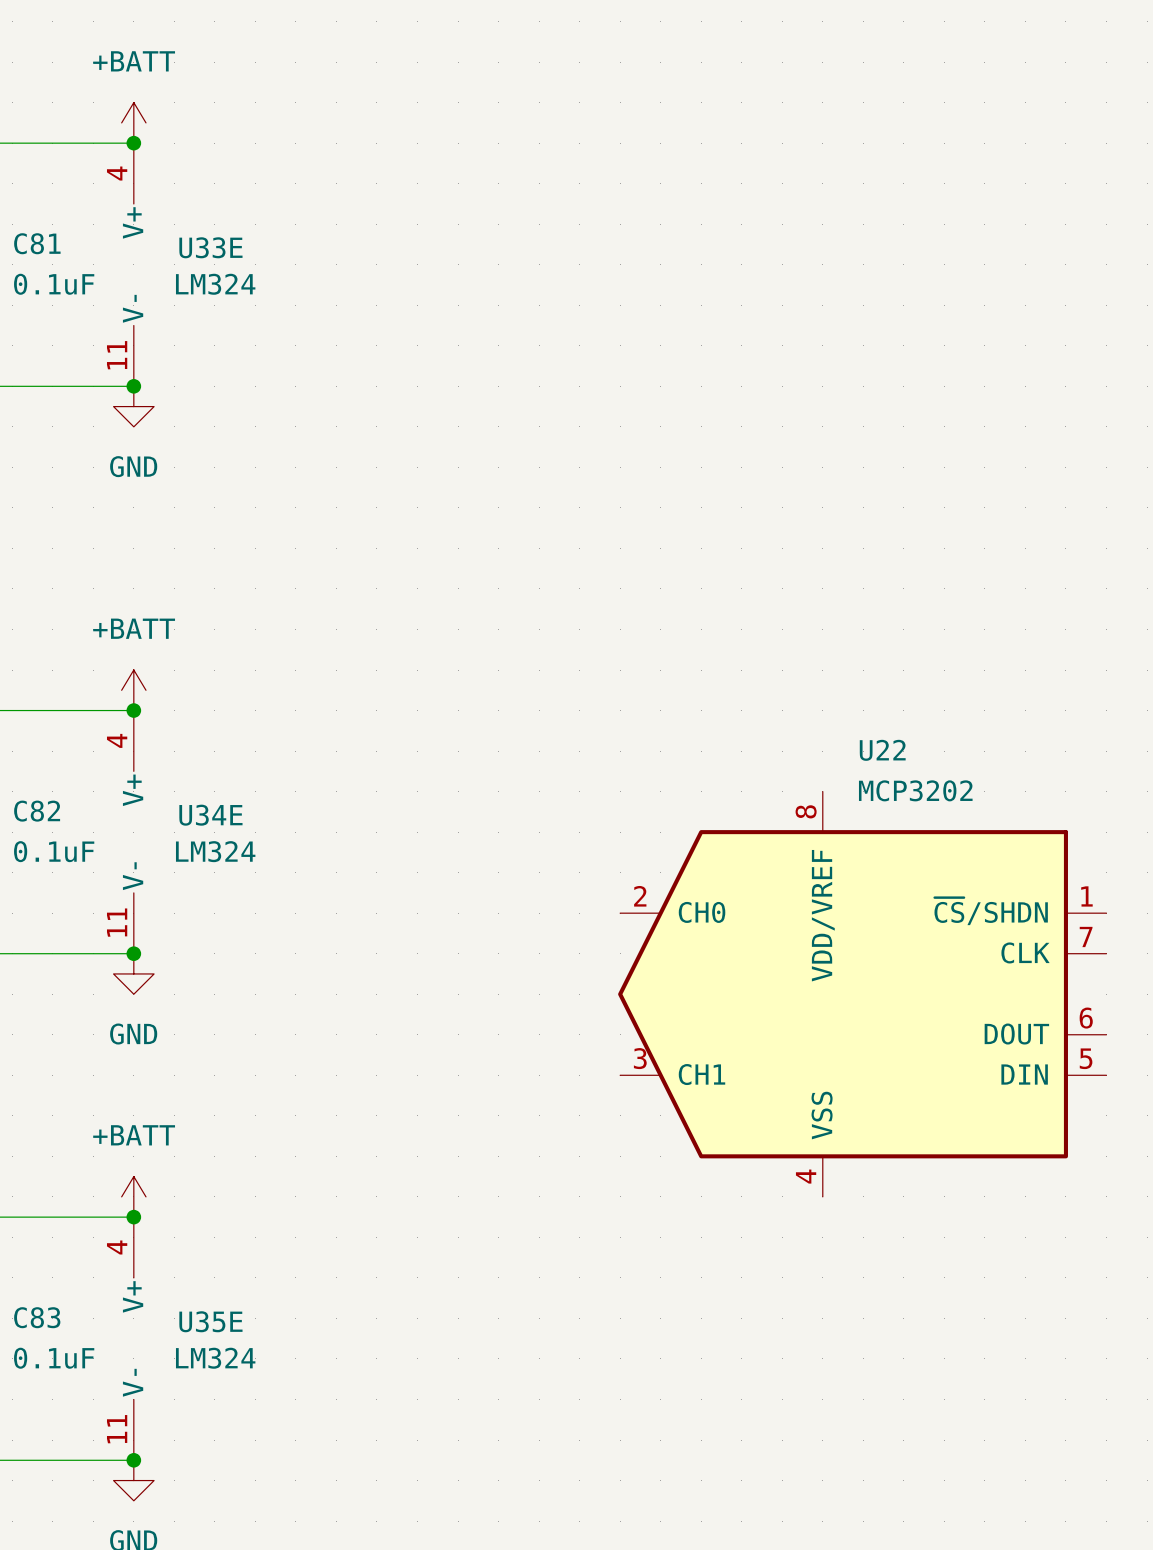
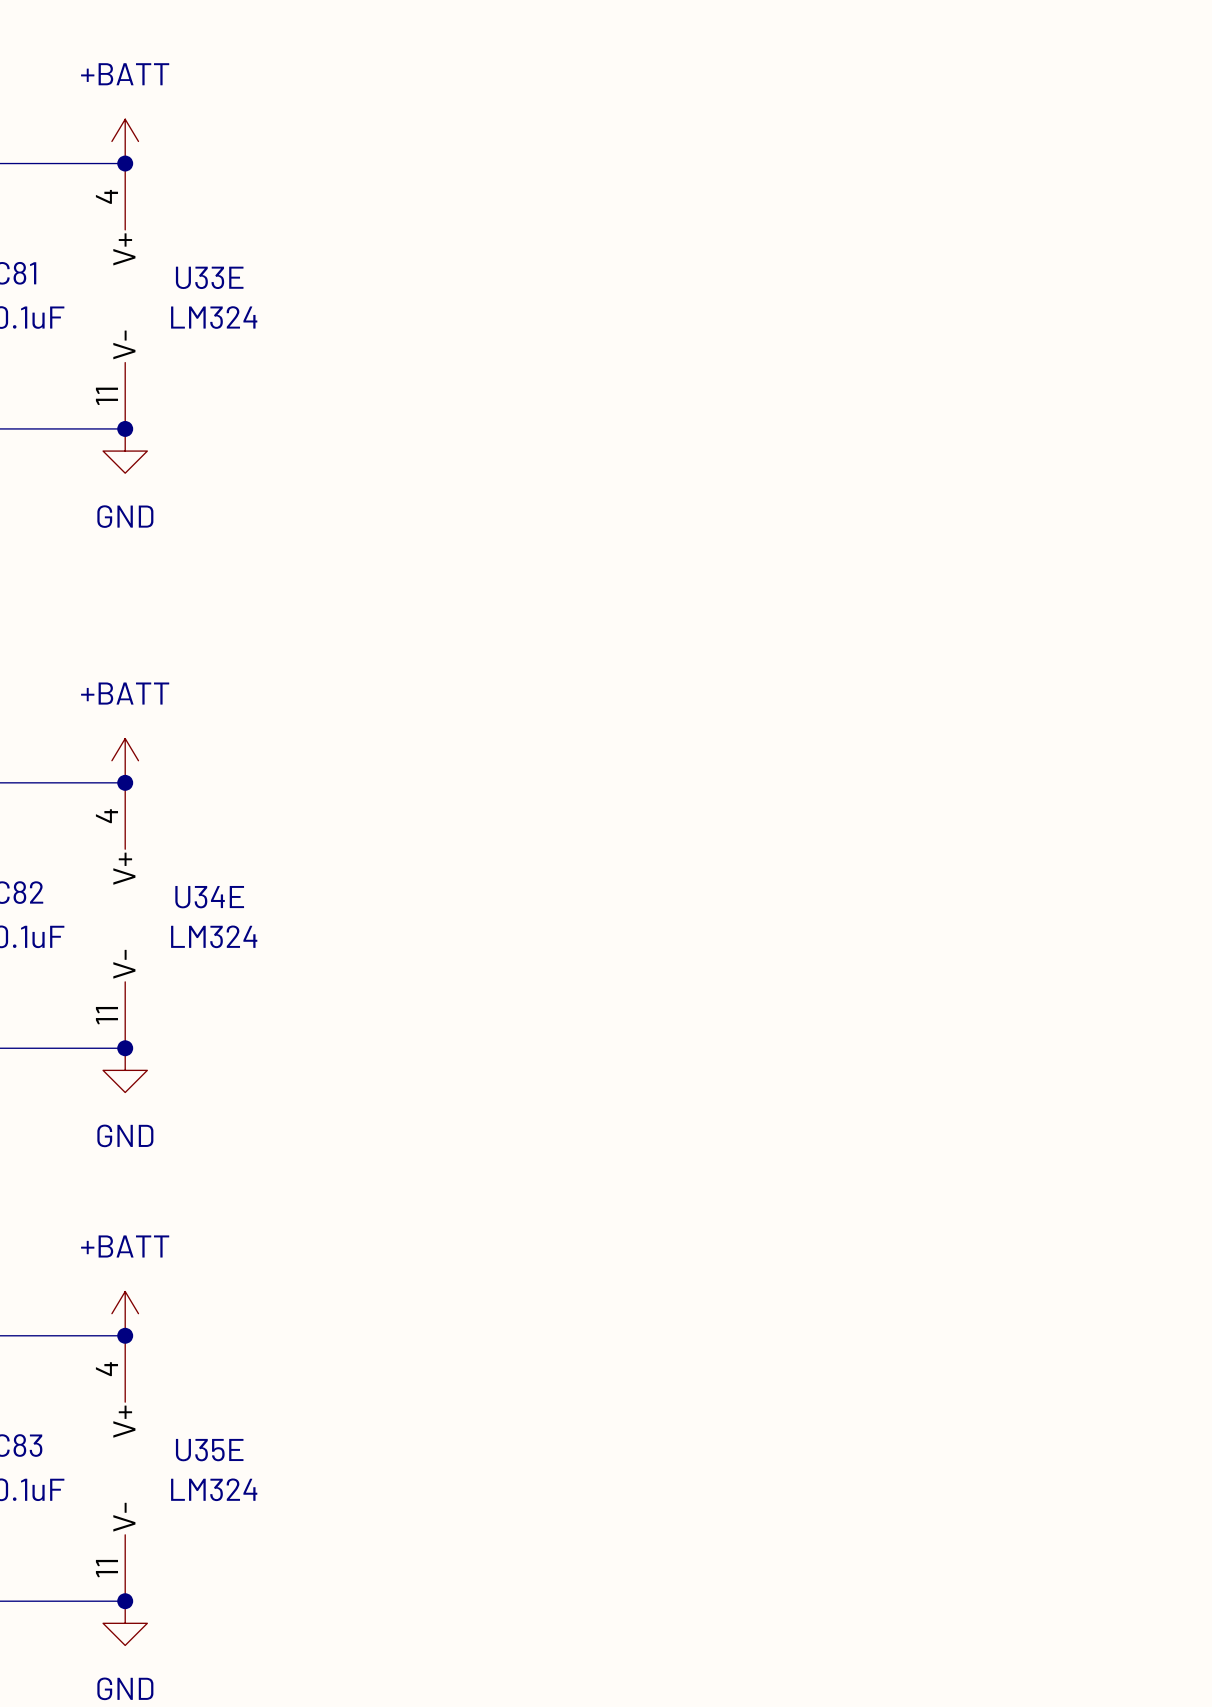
U22: MCP3202 (862, 994) -> none

